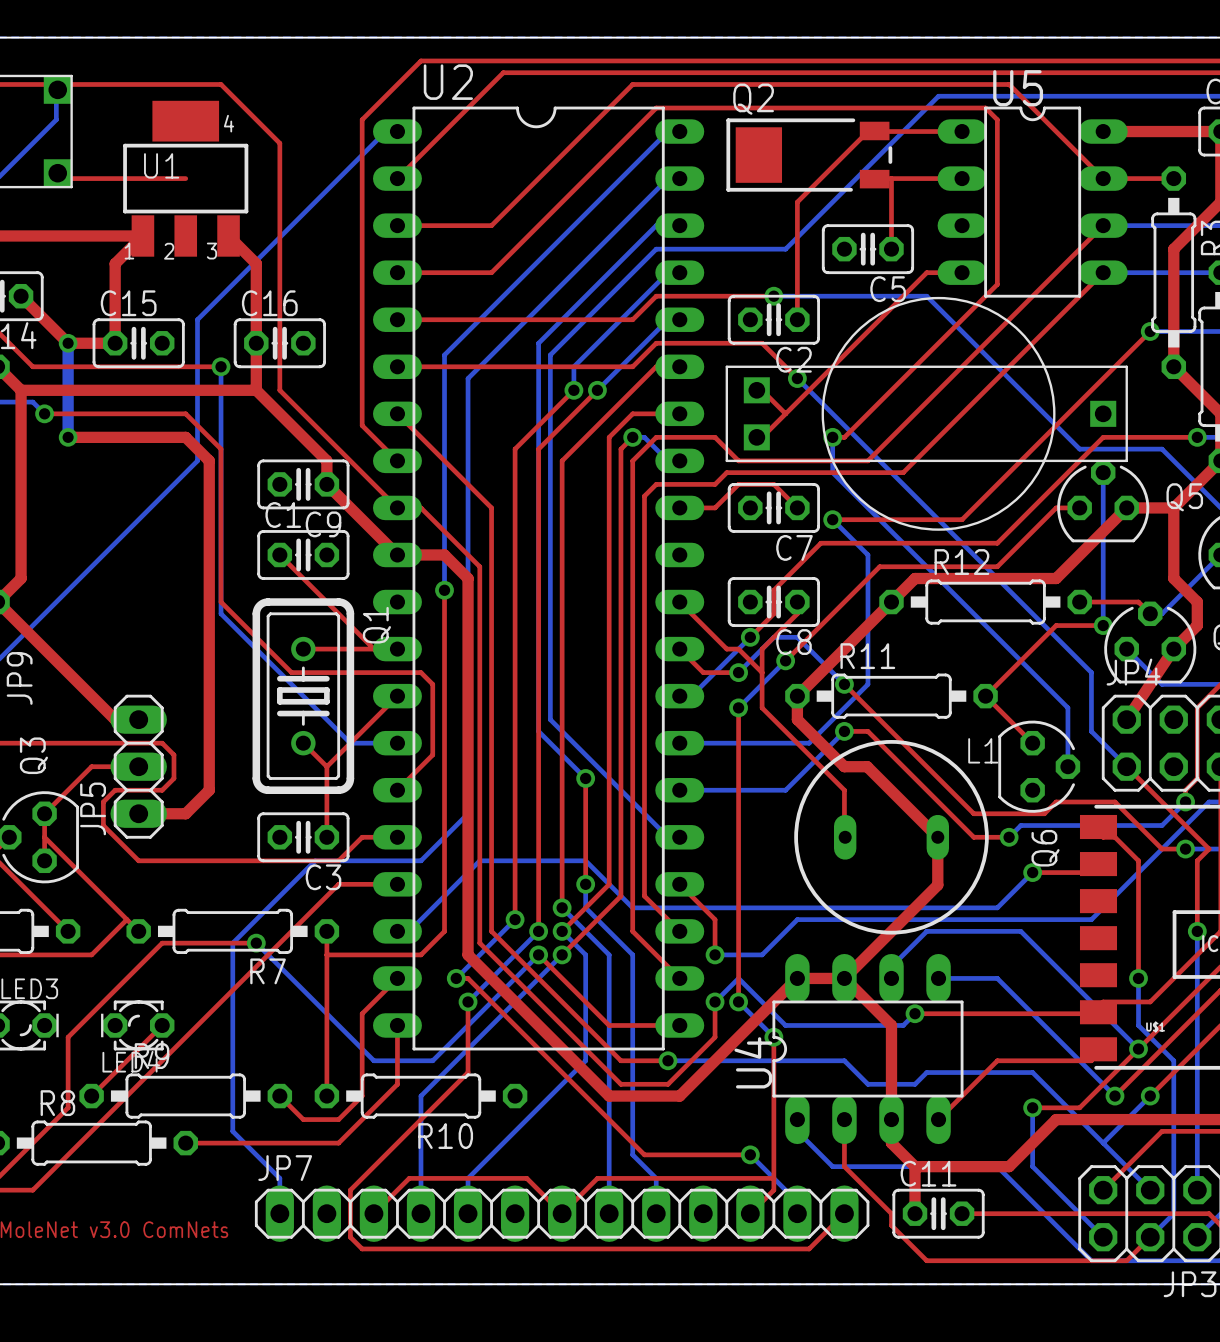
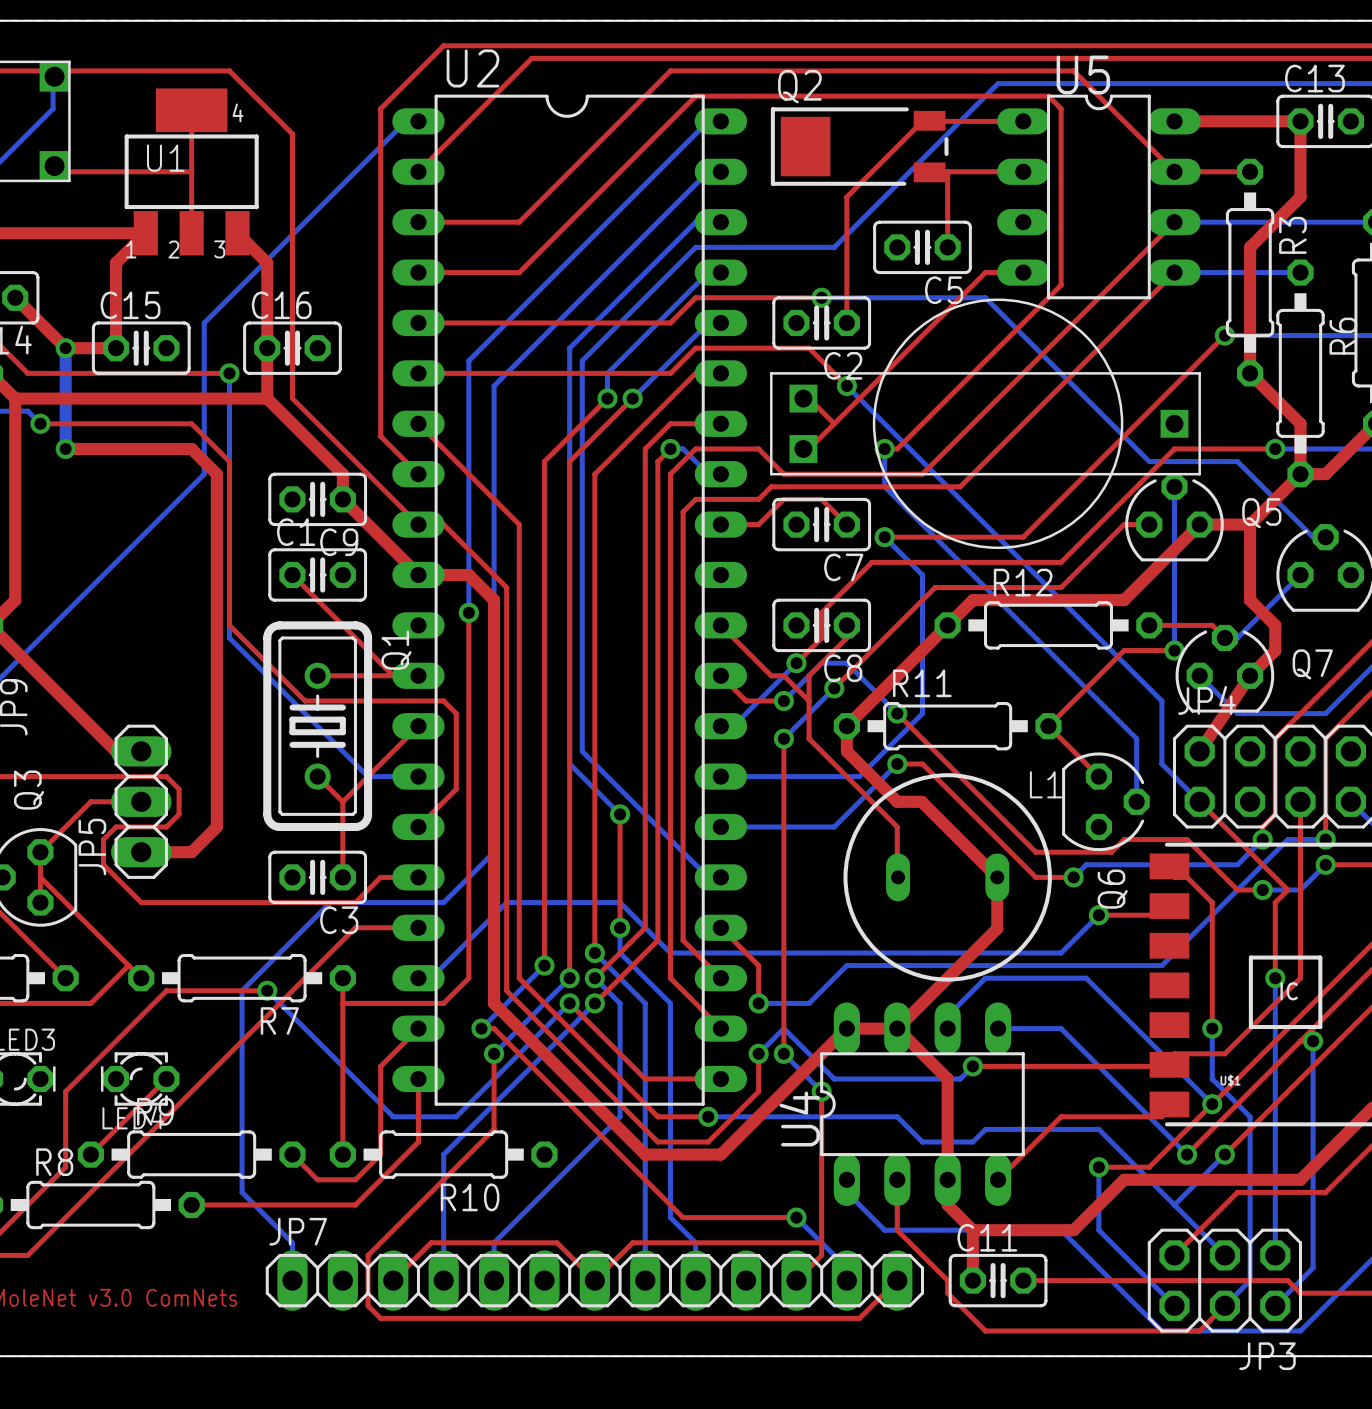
top track: none -> (191, 110) (191, 233)

